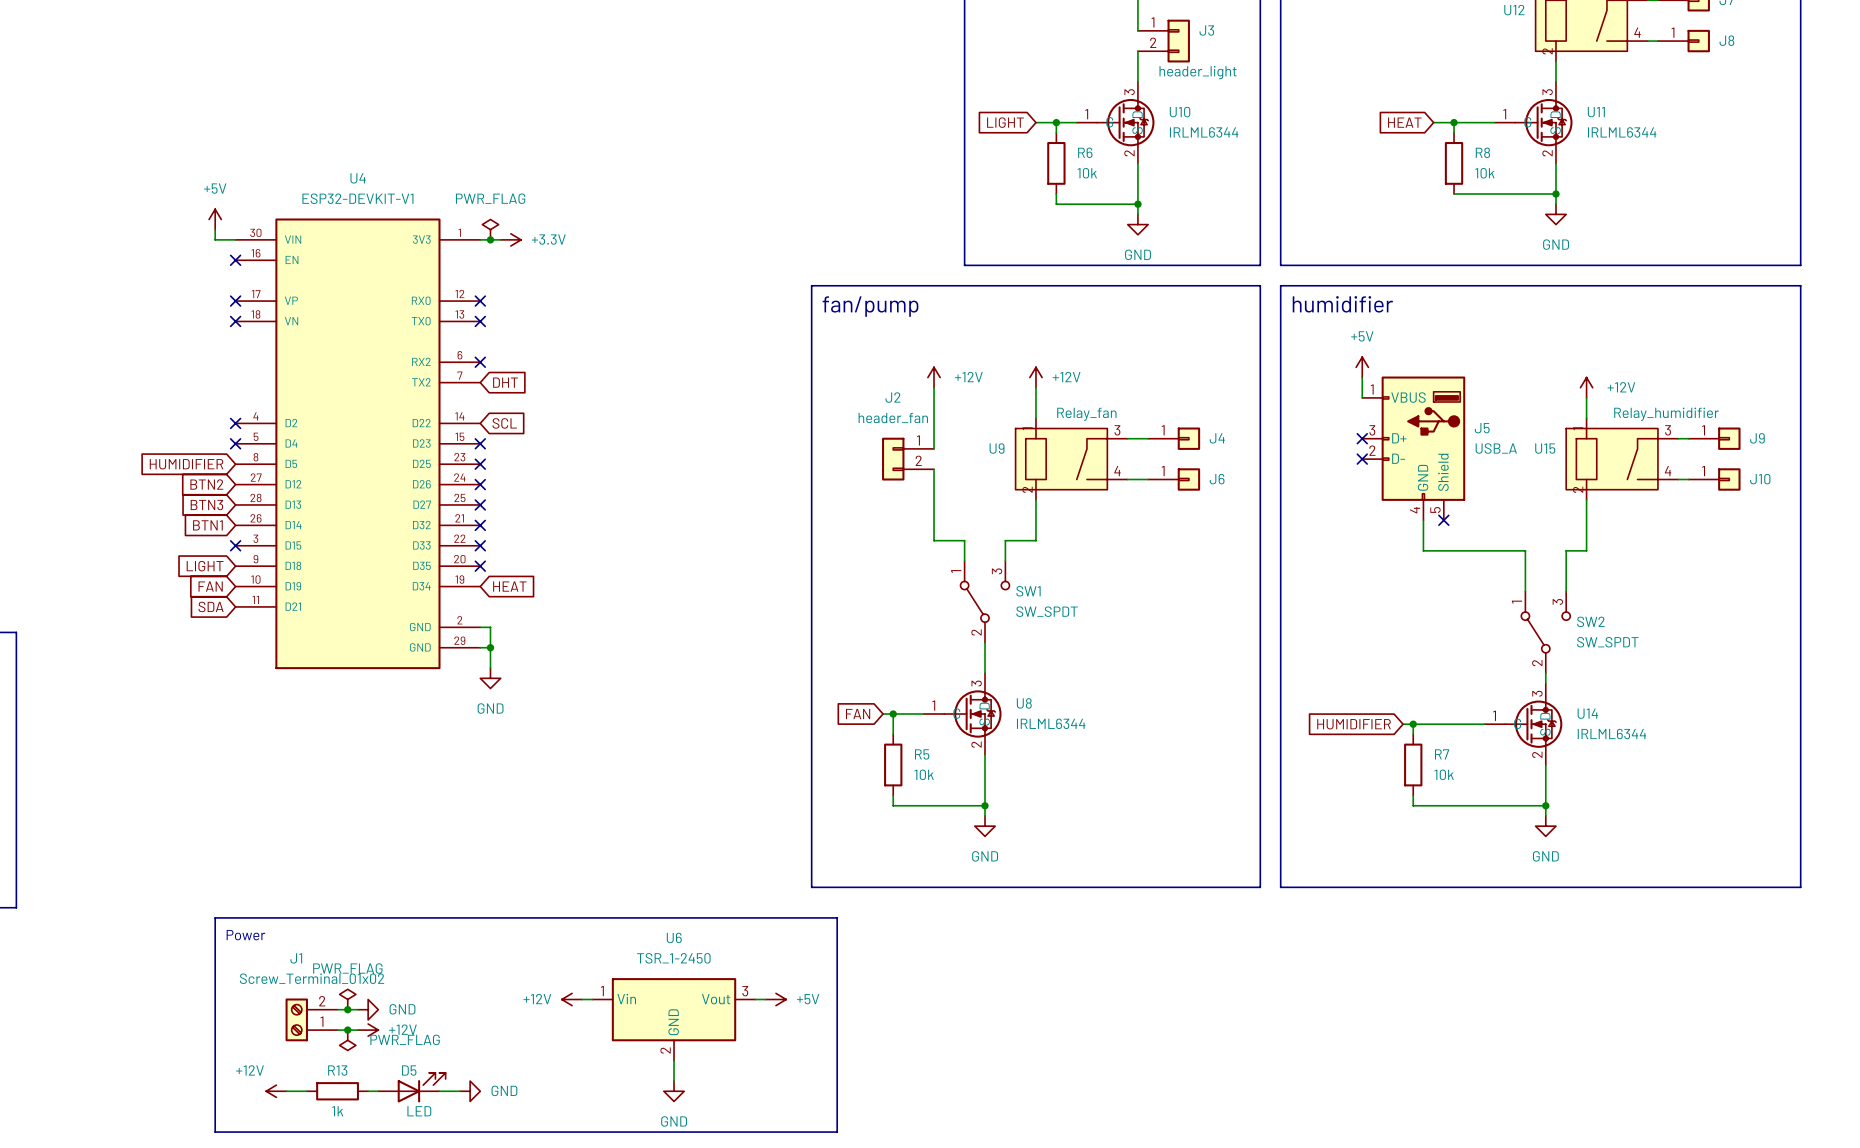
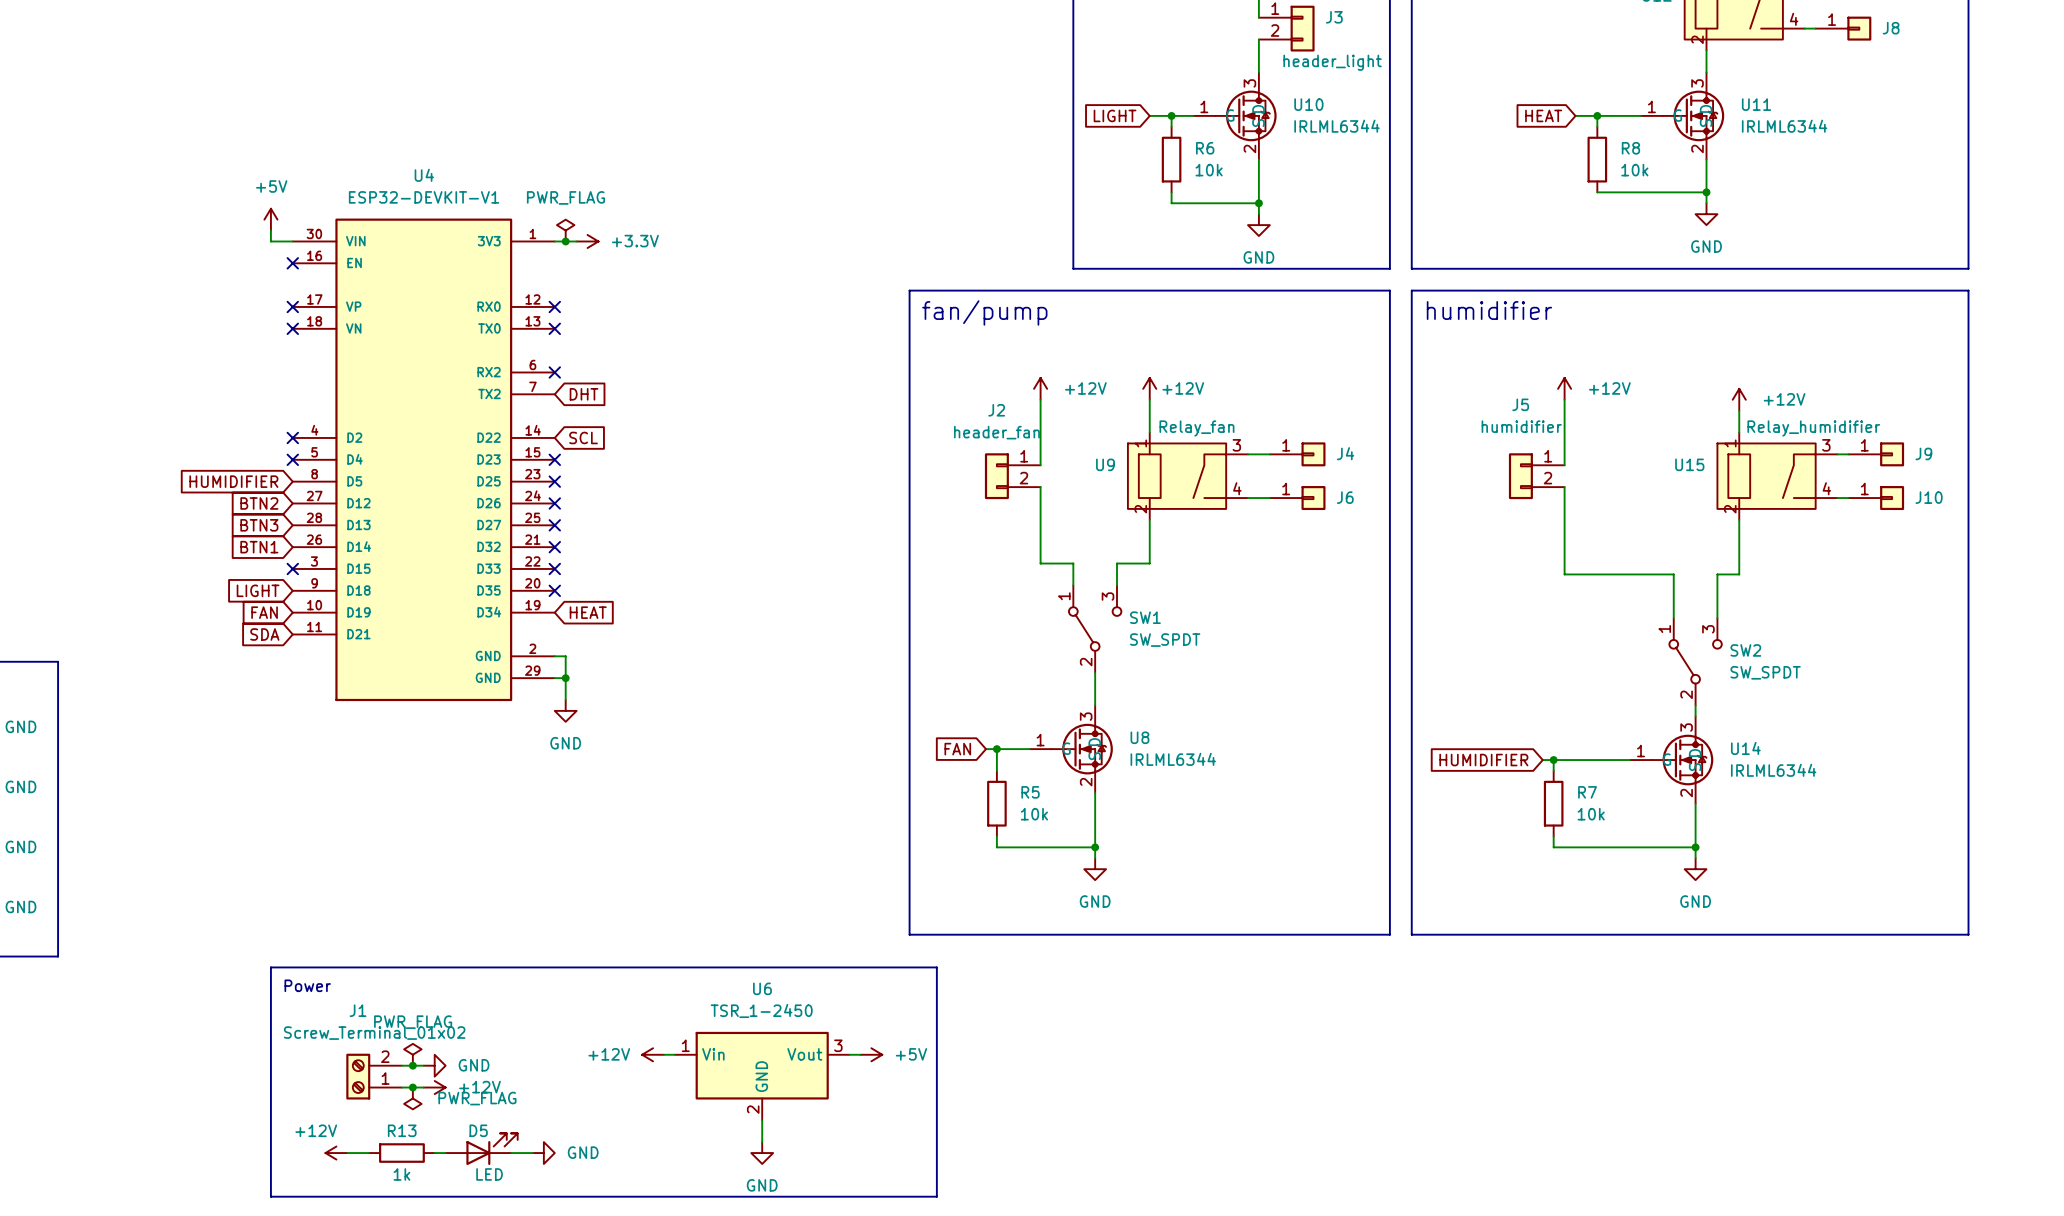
power symbol: +5V (1362, 367) -> none
J5 symbol: [1362, 376, 1466, 521] -> [1508, 453, 1565, 500]
wire: (1362, 377) (1362, 397) -> none
power symbol: none -> +12V (1564, 388)
J5 name position: J5 (1482, 428) -> J5 (1520, 404)
no-connect mark: (1362, 438) -> none
J5 value: USB_A (1496, 448) -> humidifier (1521, 426)
no-connect mark: (1362, 459) -> none
no-connect mark: (1443, 520) -> none

